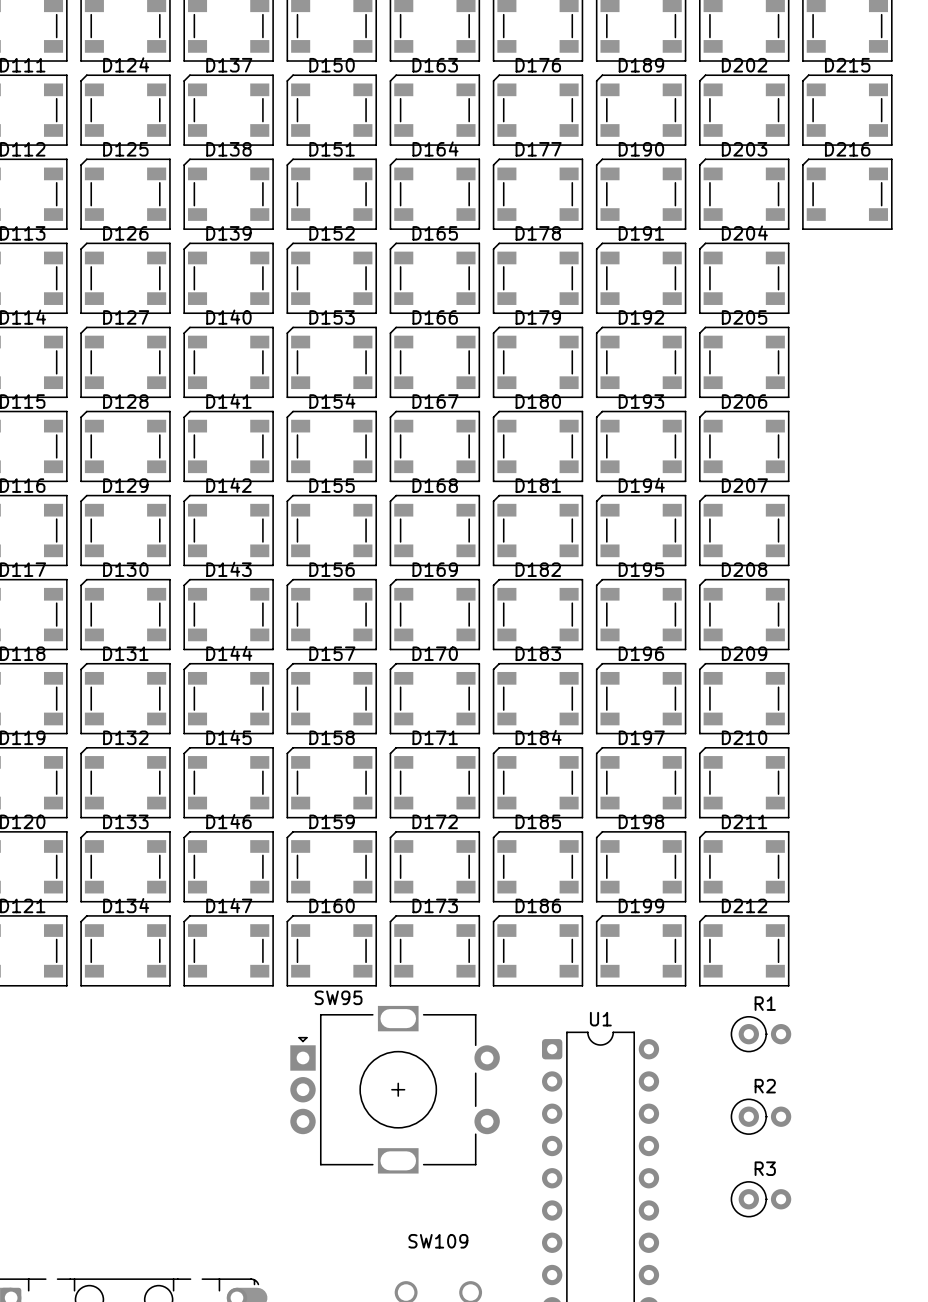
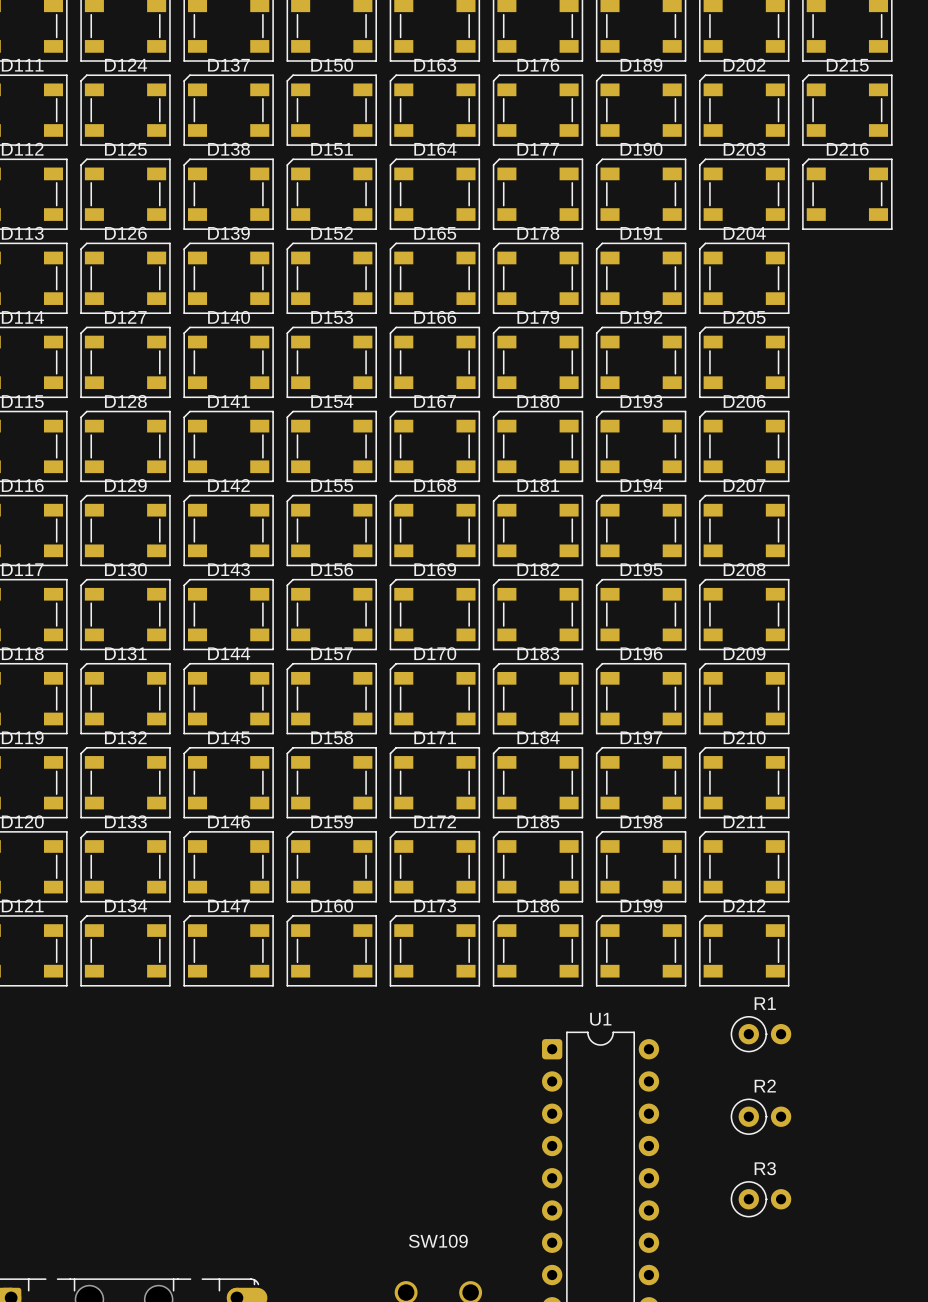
SW95: (395, 1089) -> none

